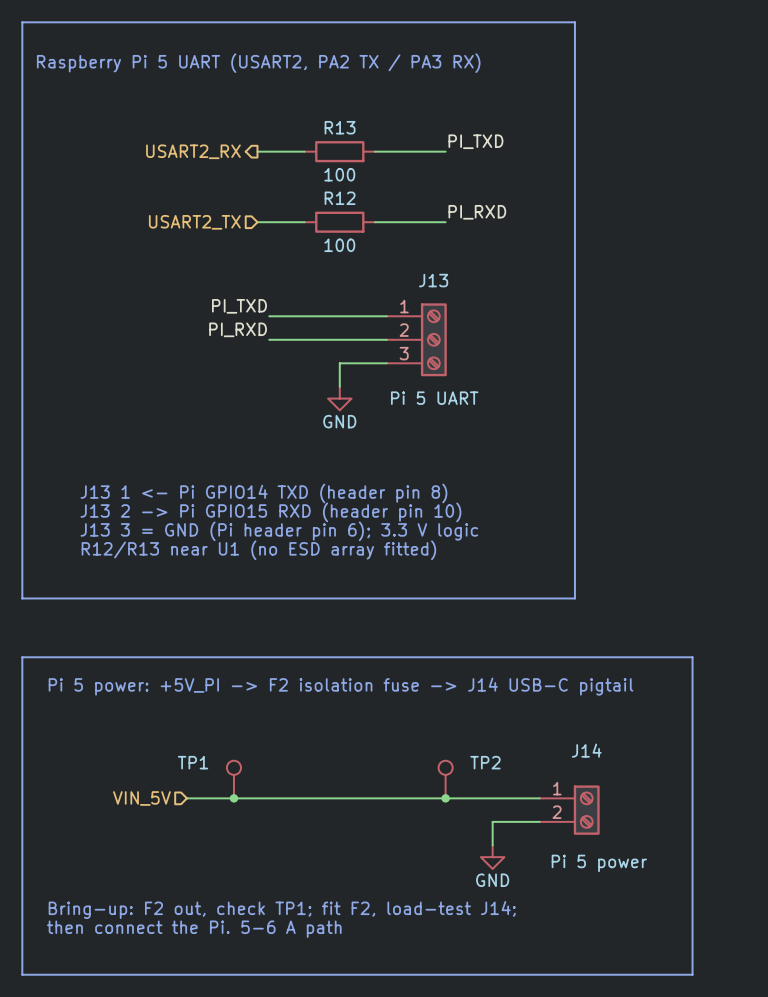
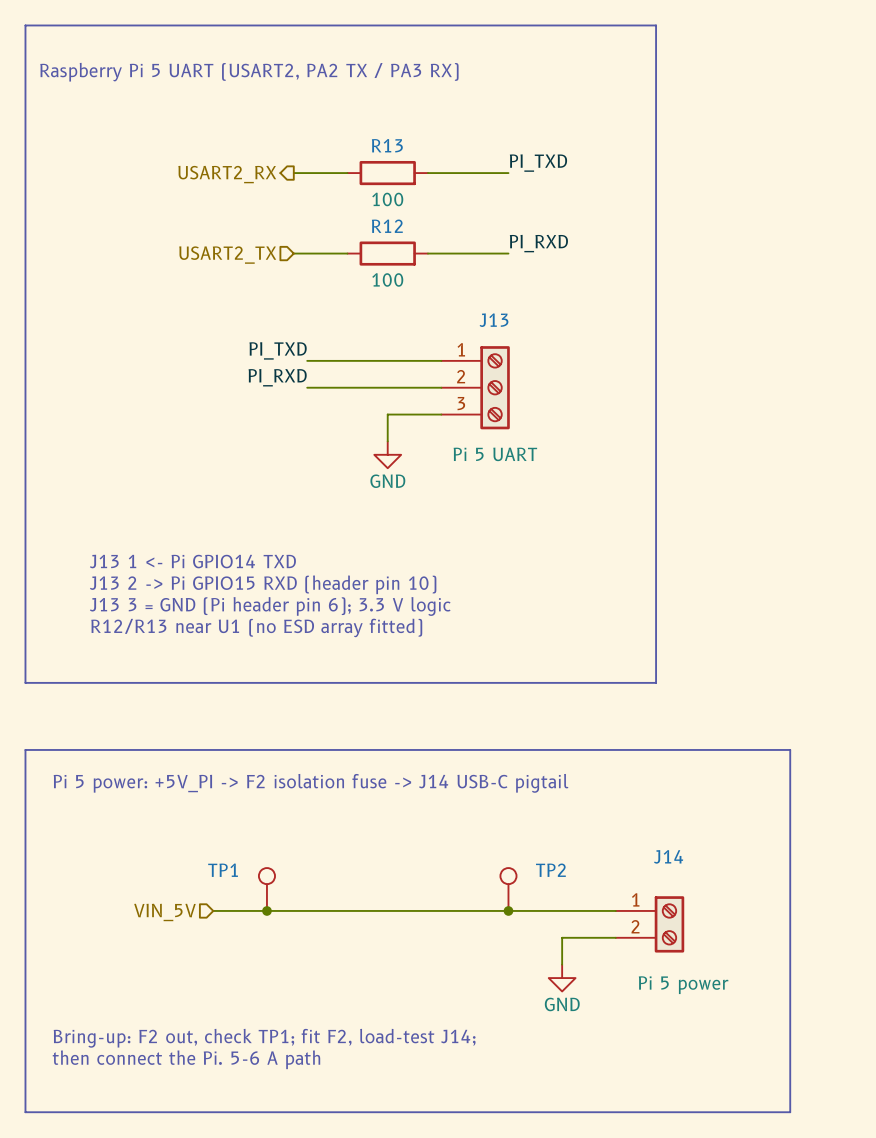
text: J13 1 <- Pi GPIO14 TXD (header pin 8) (263, 493) -> J13 1 <- Pi GPIO14 TXD (192, 561)

